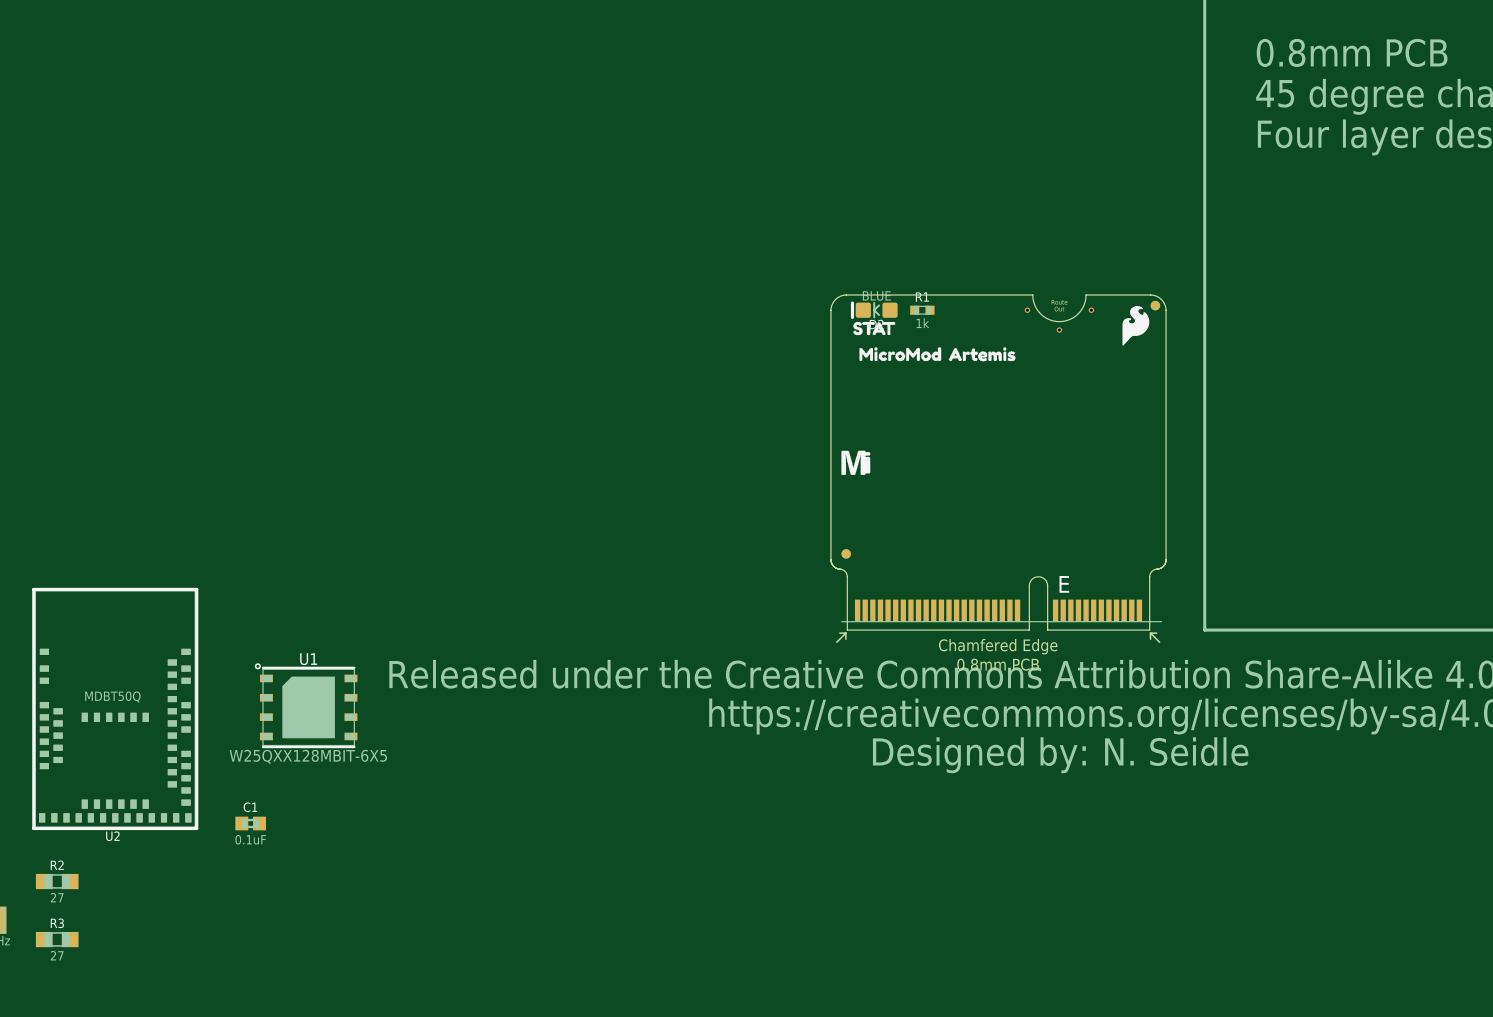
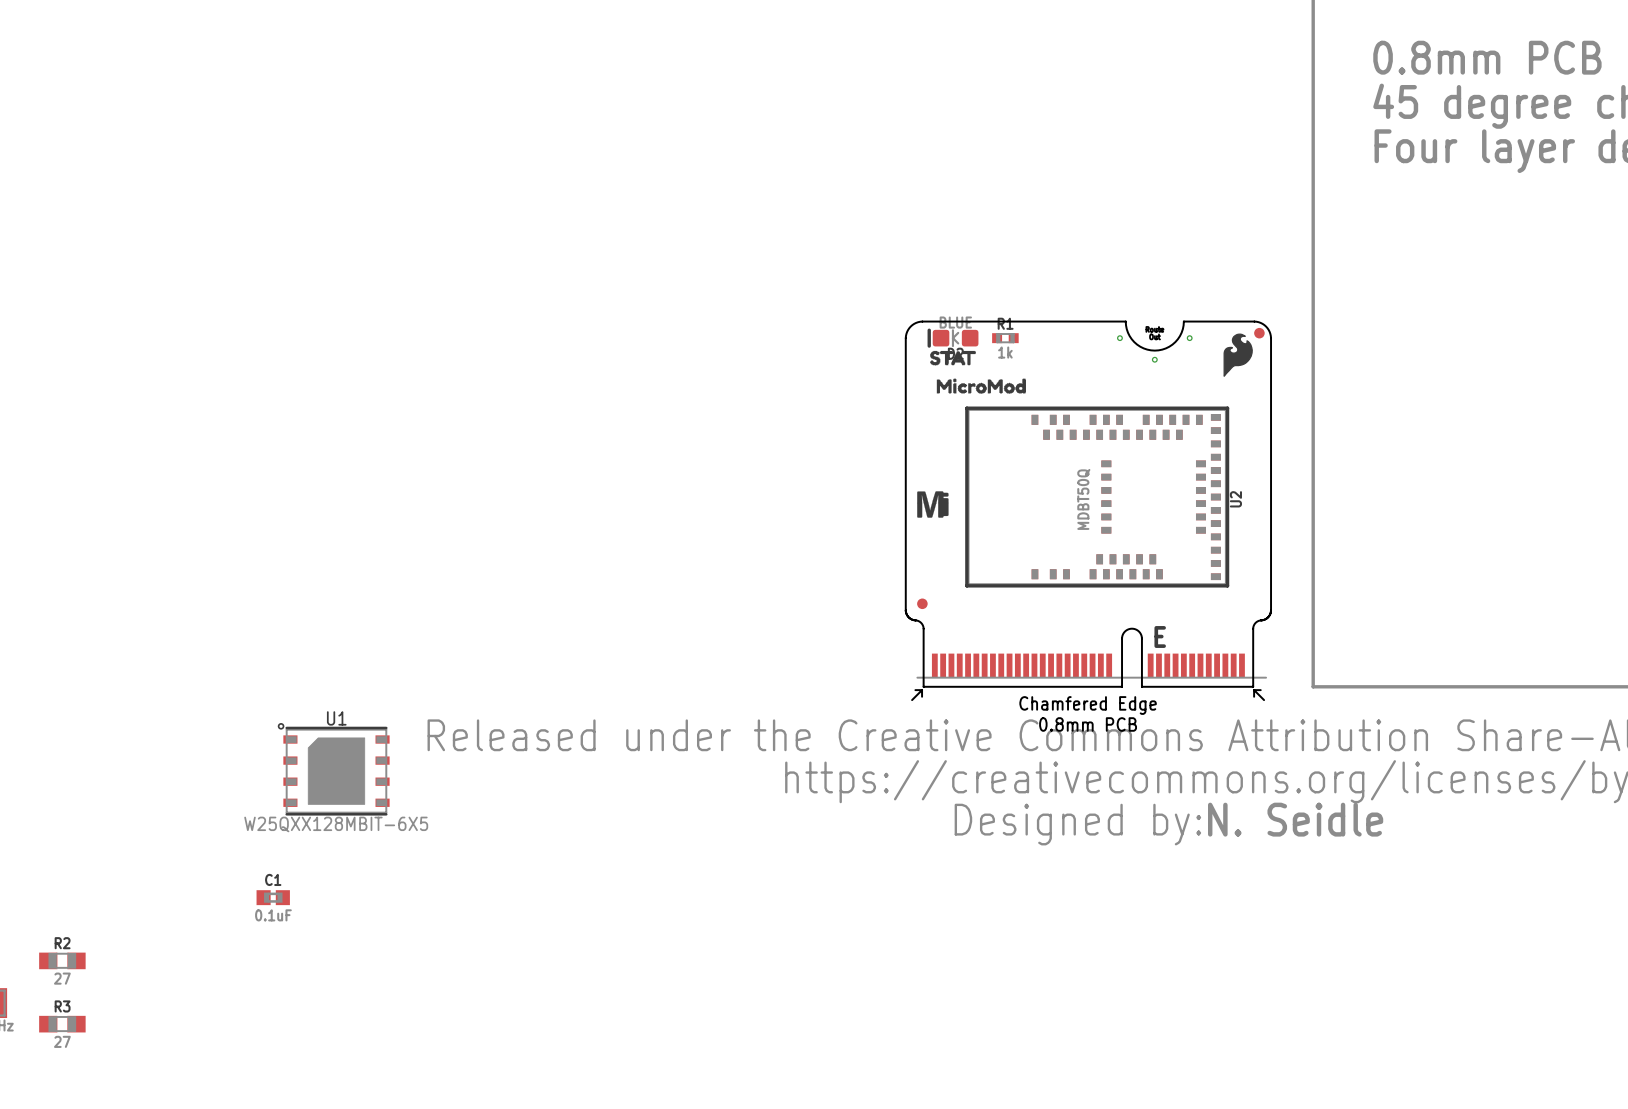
drawing: [948, 347, 1016, 362] -> none
U2 rotation: 0° (115, 708) -> 90° counterclockwise (1097, 497)
U2 position: (115, 708) -> (1097, 497)

